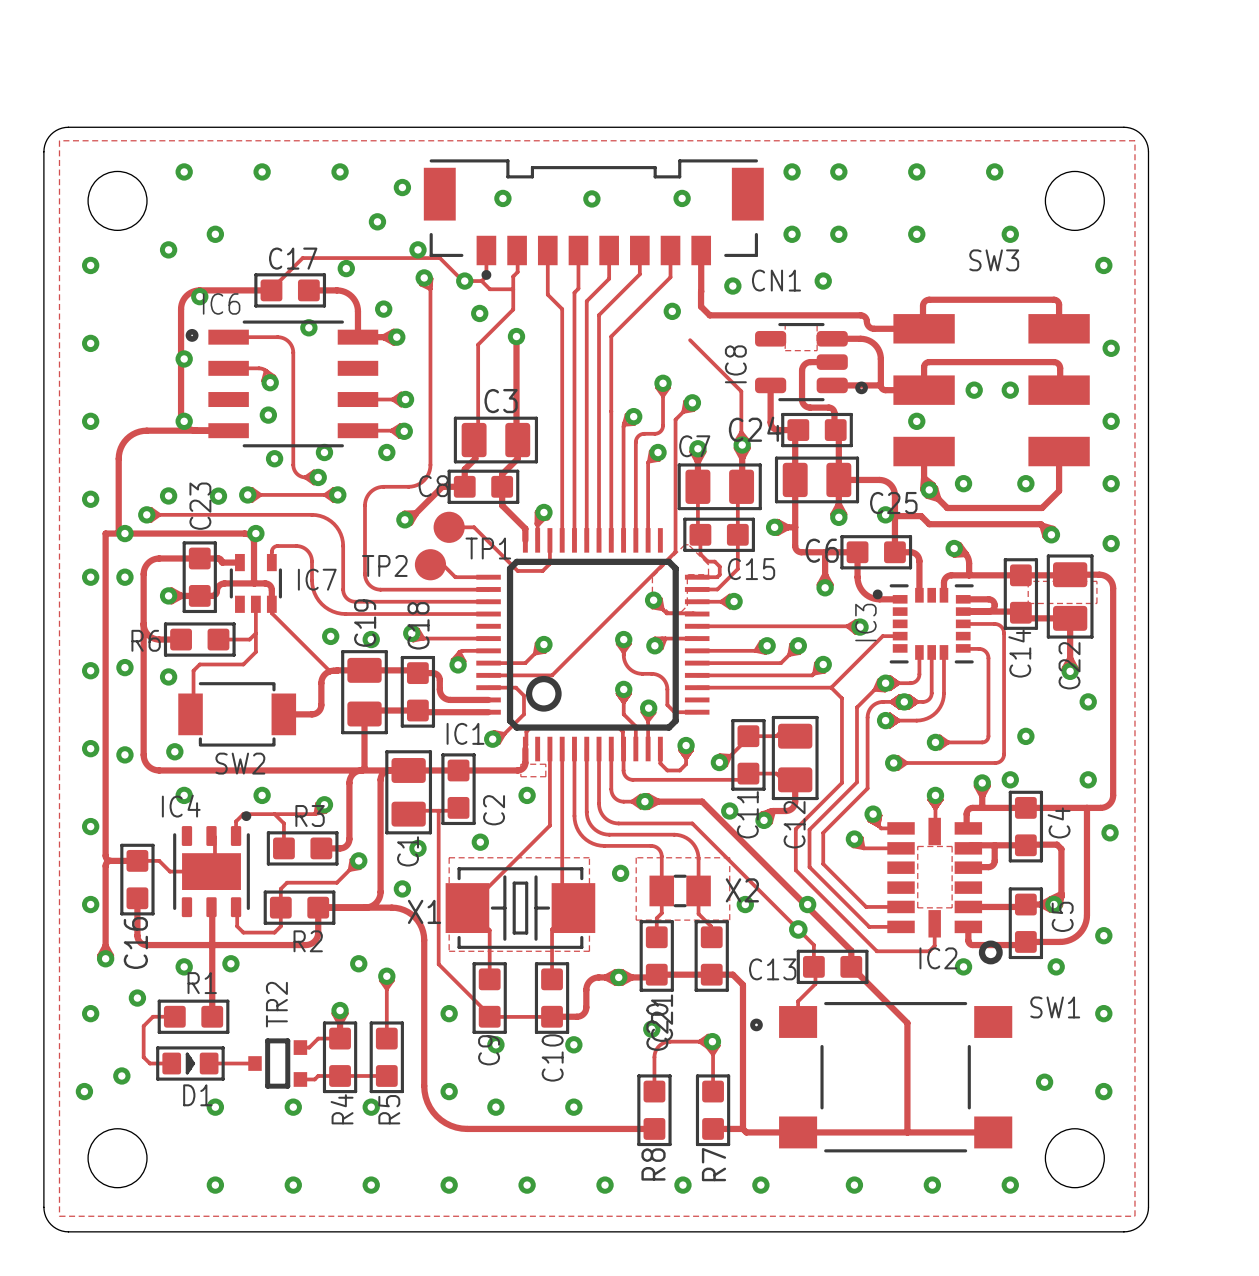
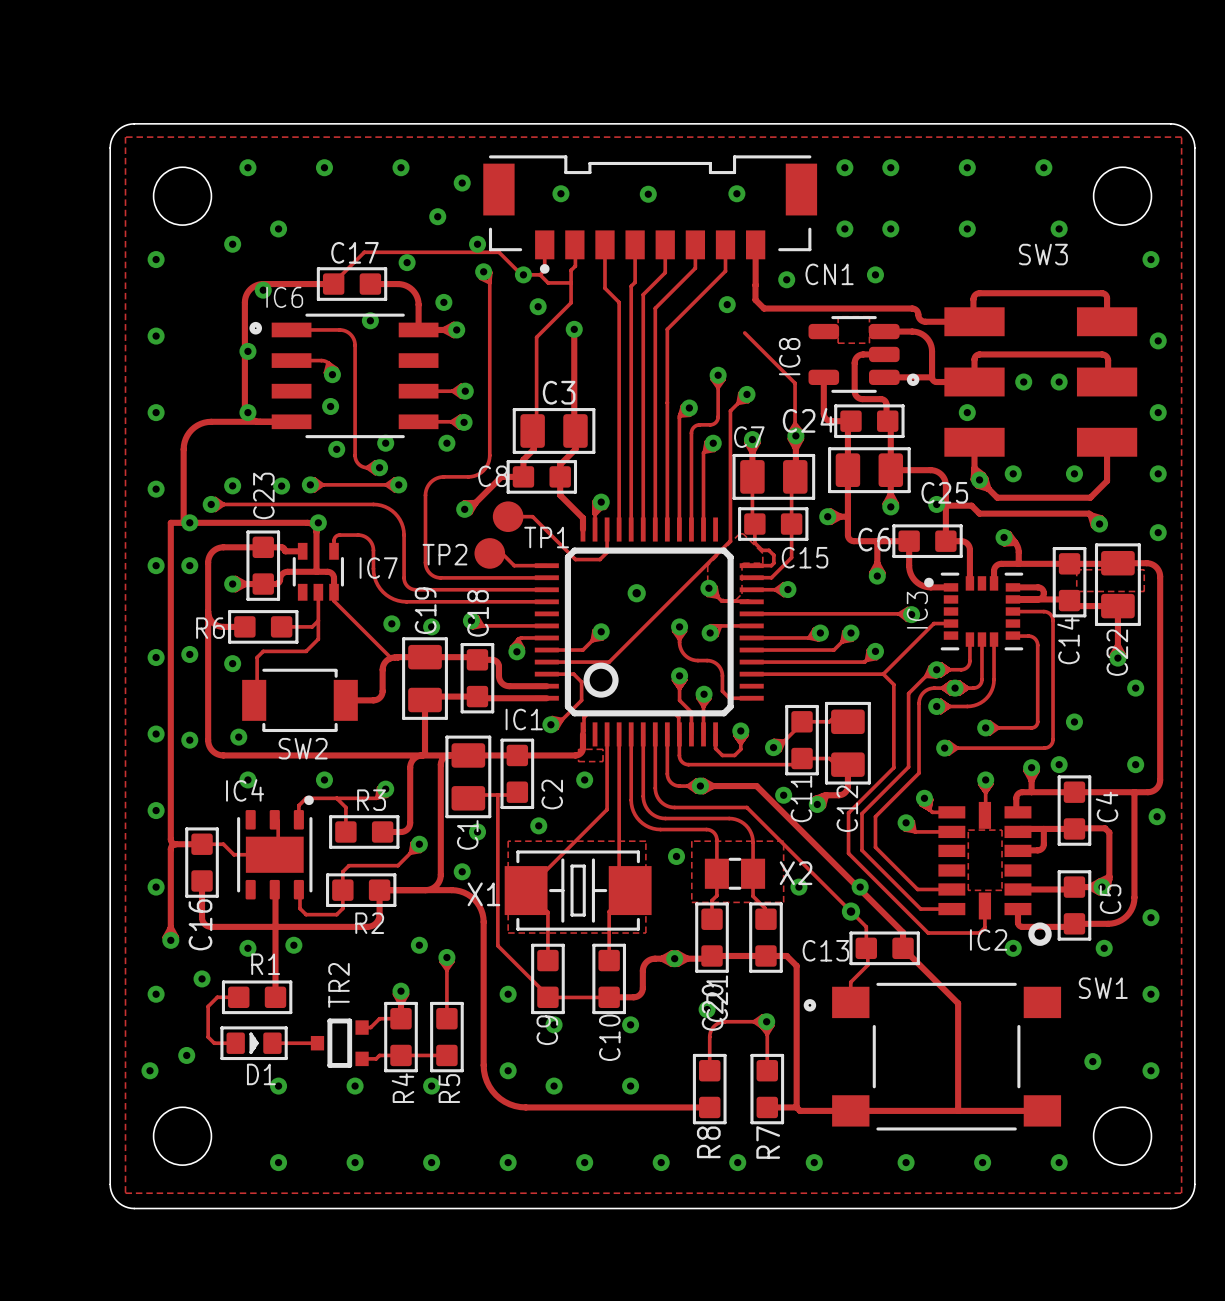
via: none -> (636, 593)

